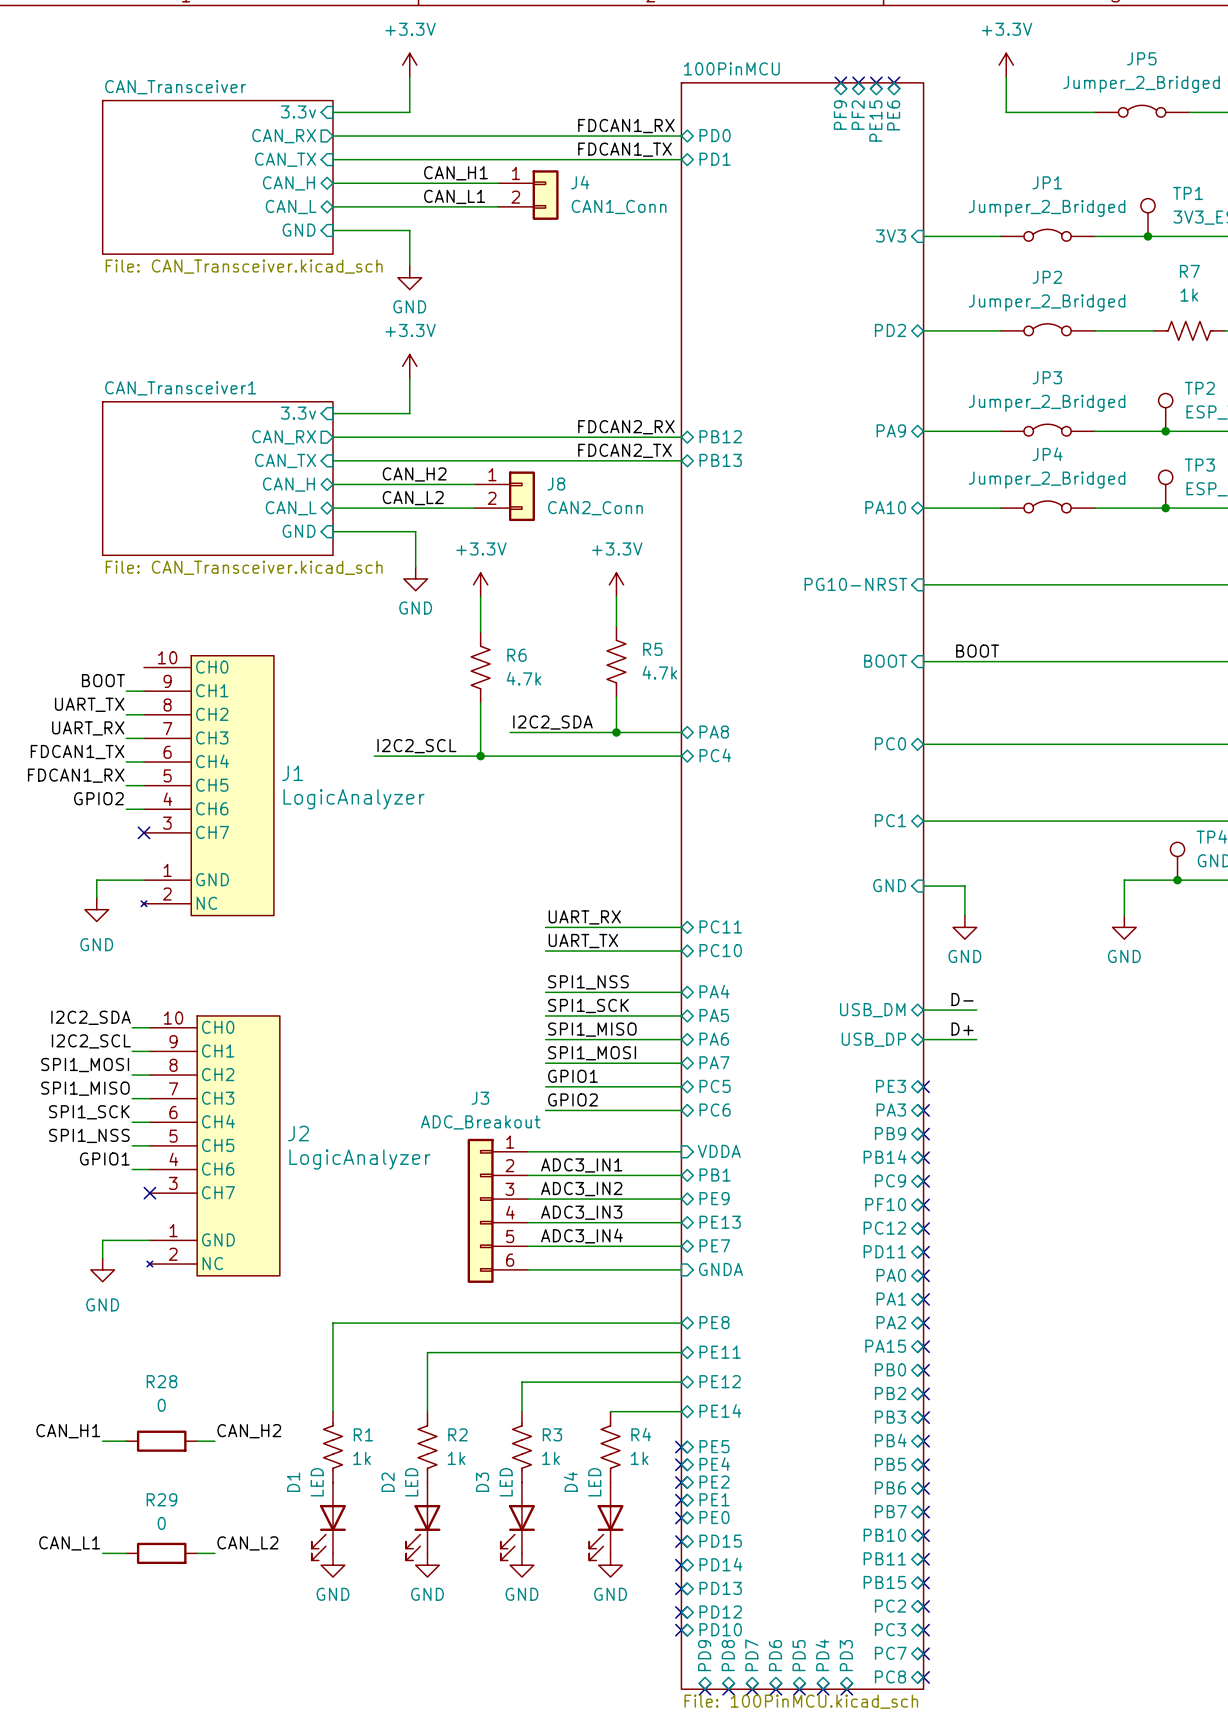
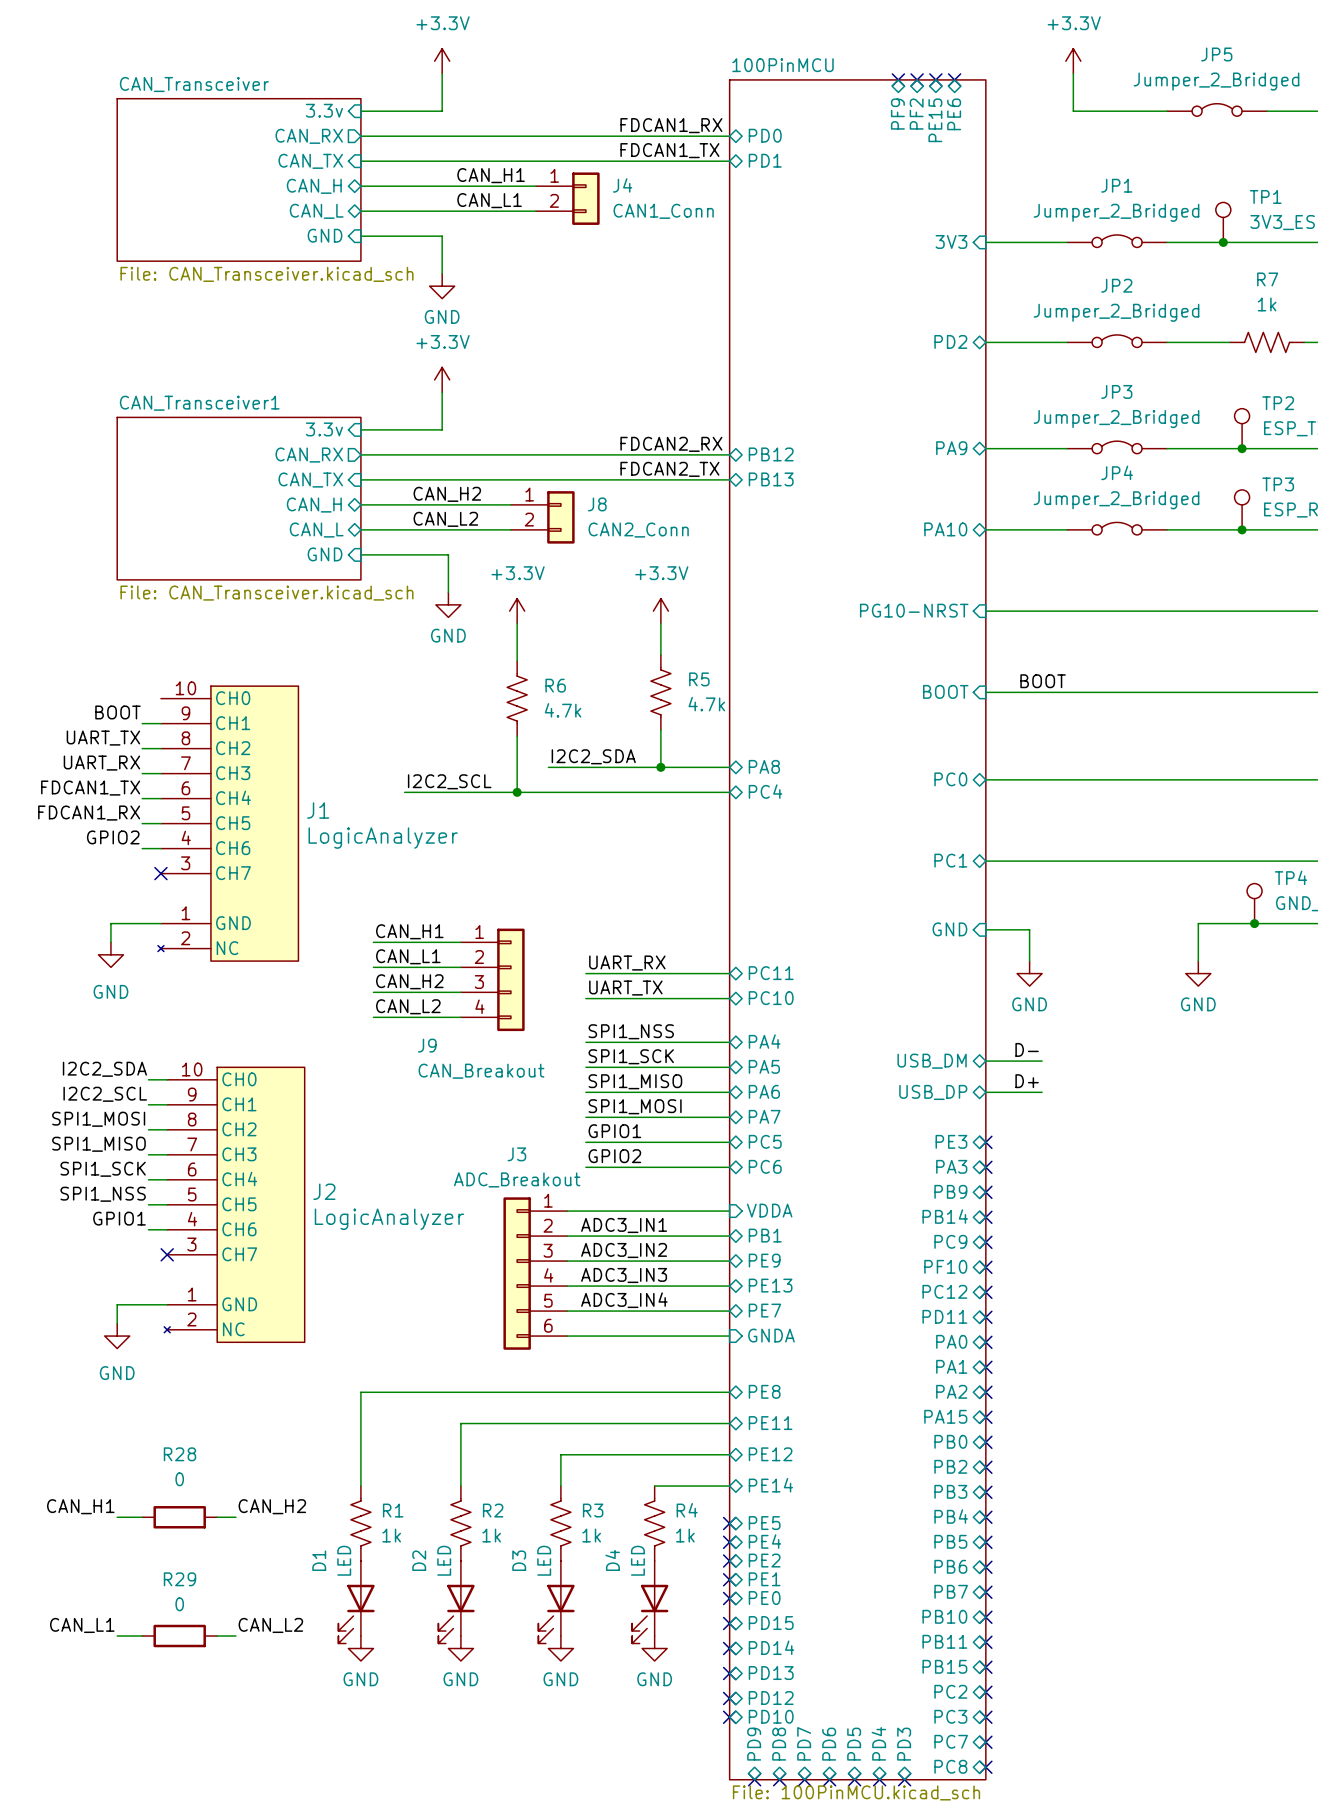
label: none -> CAN_H1 (409, 931)
wire: none -> (373, 942) (460, 942)
label: none -> CAN_L1 (408, 956)
wire: none -> (373, 967) (460, 967)
J9: none -> CAN_Breakout (492, 979)
label: none -> CAN_H2 (409, 981)
wire: none -> (373, 992) (460, 992)
label: none -> CAN_L2 (408, 1006)
wire: none -> (373, 1017) (460, 1017)

